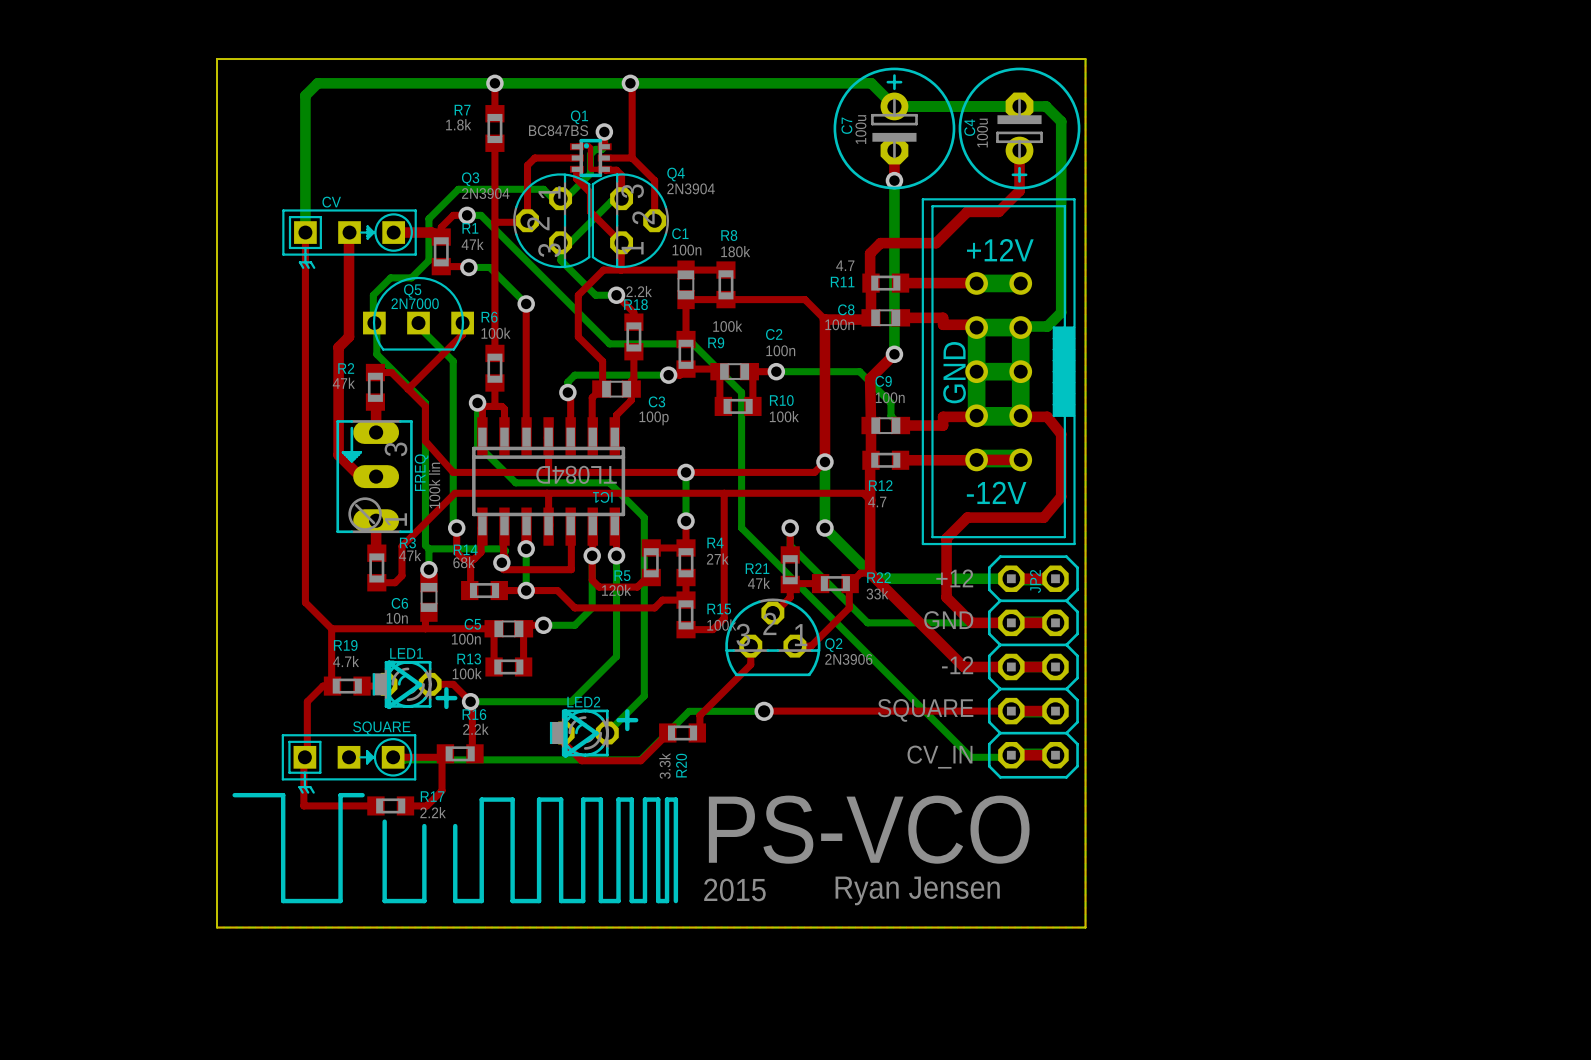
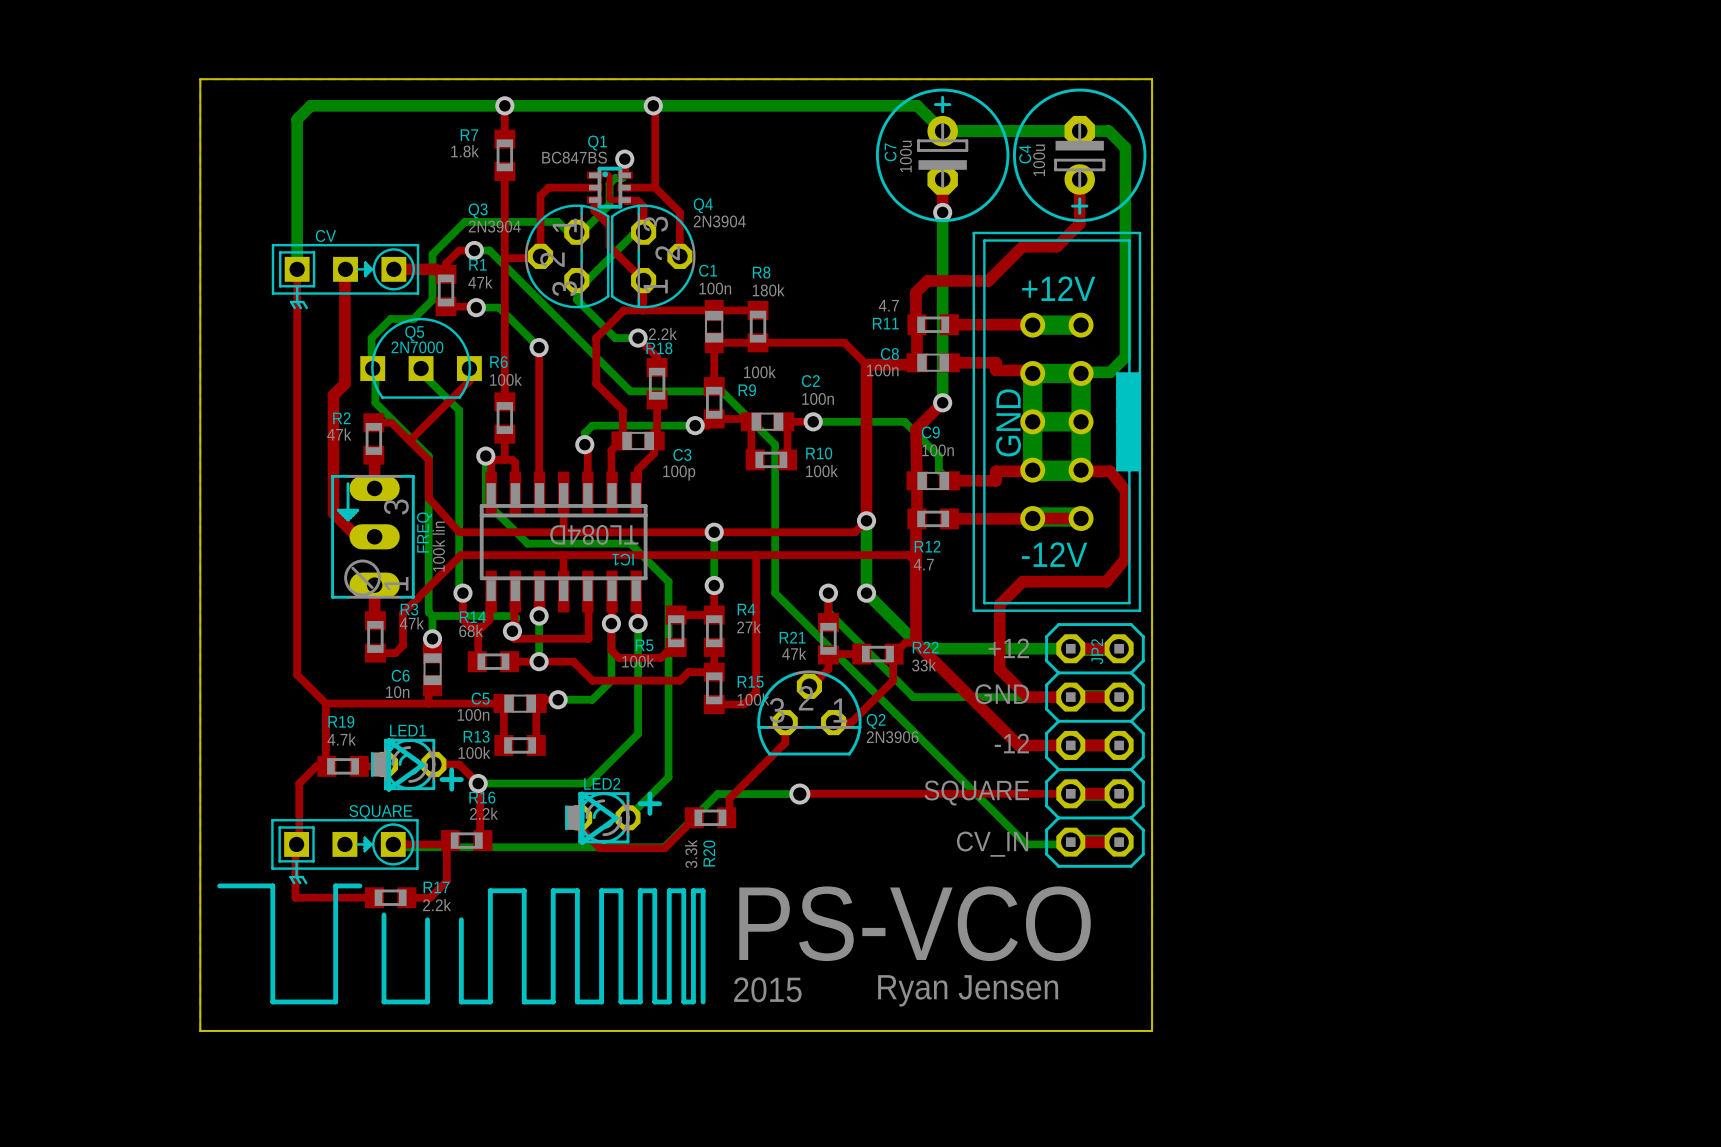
R5 value: 120k (616, 590) -> 100k (638, 661)

